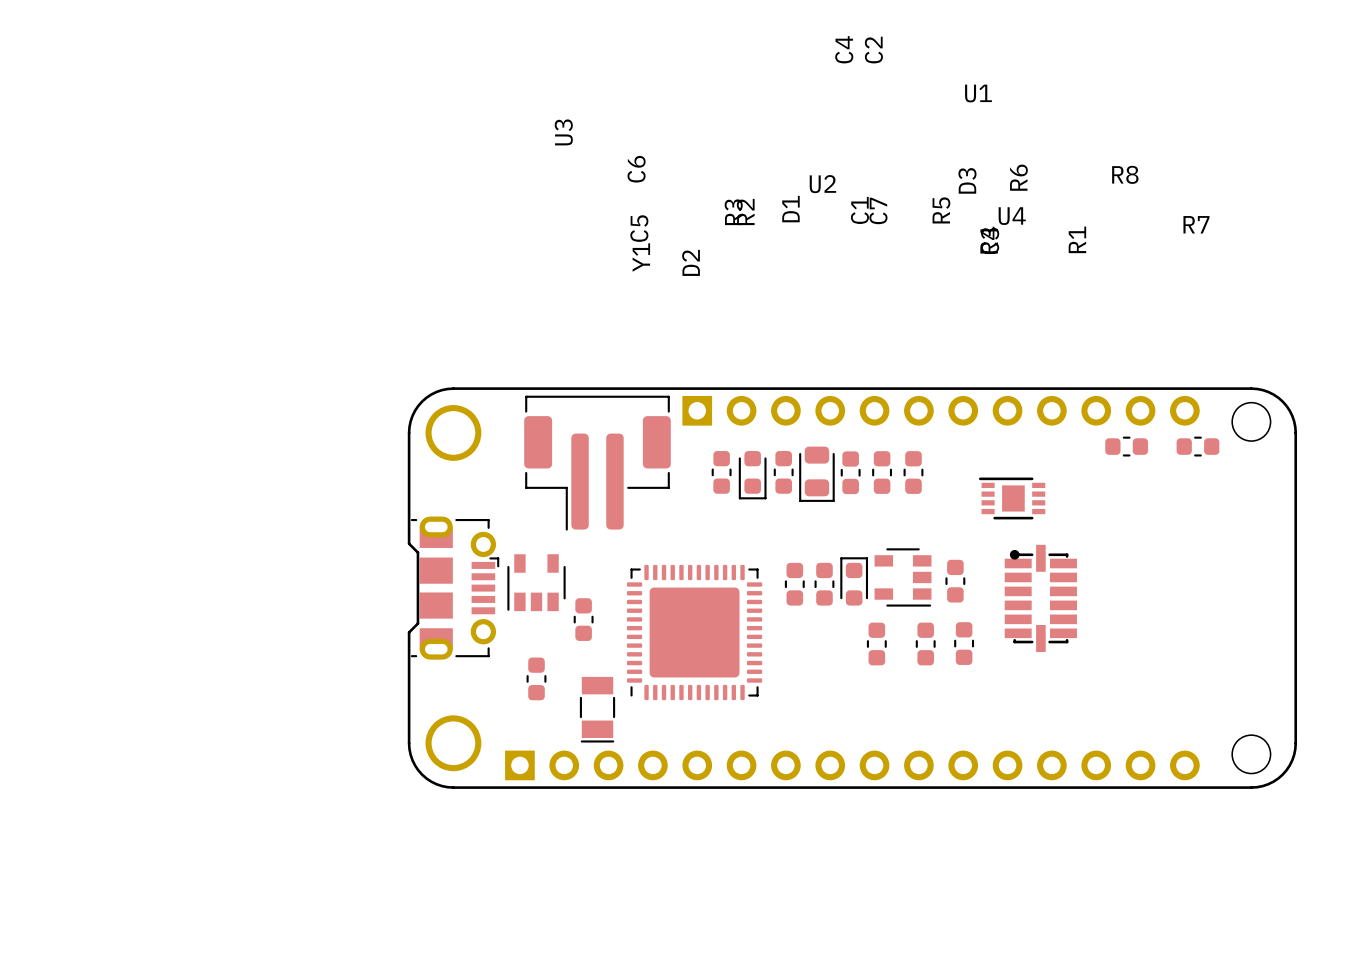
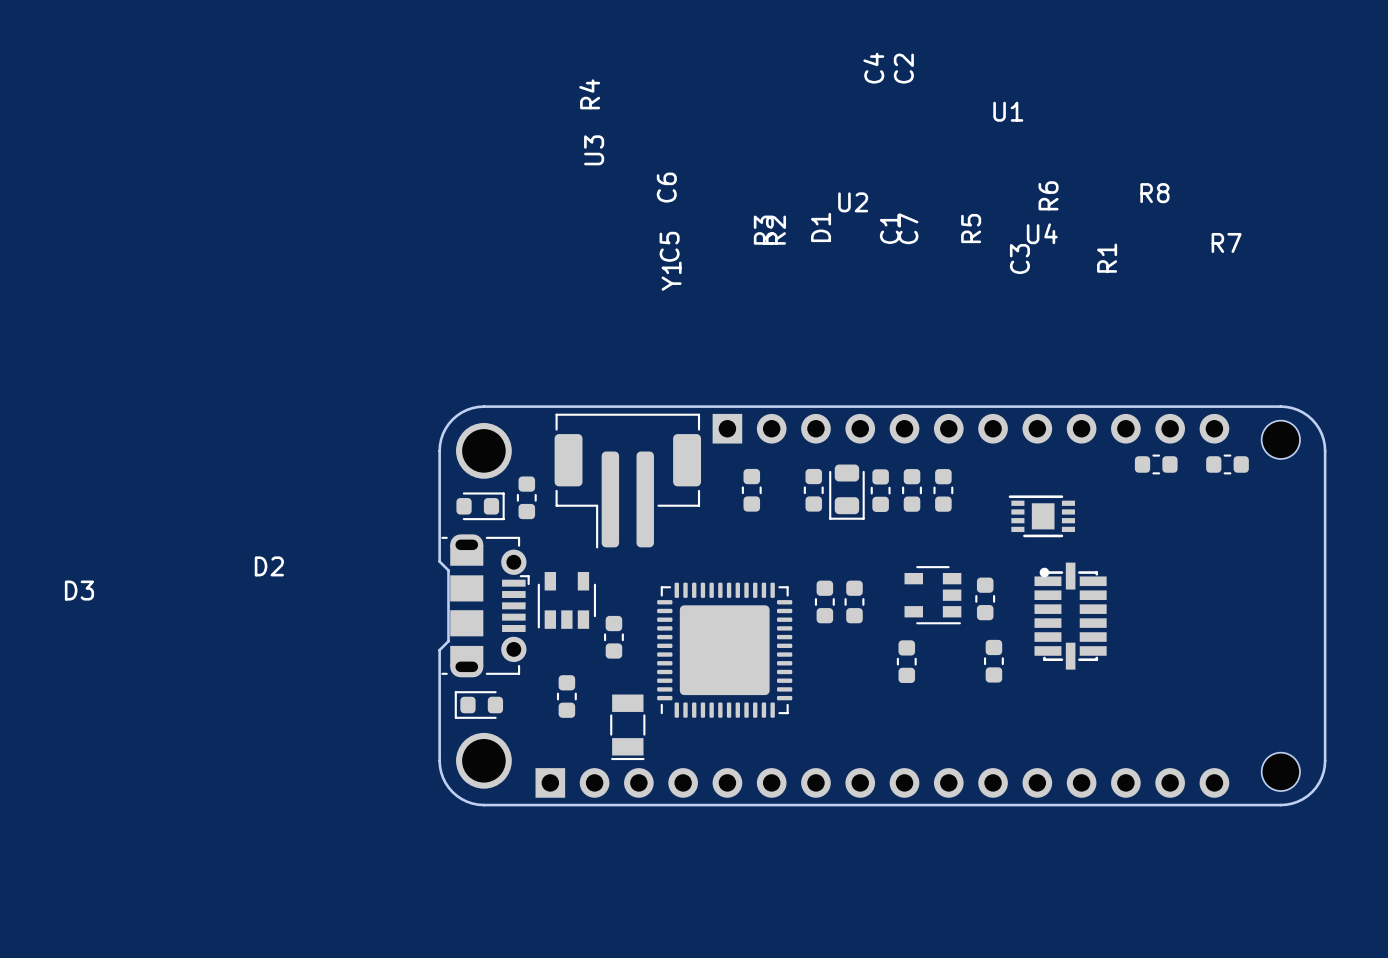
D2 rotation: 0° (752, 475) -> 90° counterclockwise (480, 506)
D2 position: (752, 475) -> (480, 506)
D3 rotation: 0° (854, 581) -> 90° counterclockwise (478, 705)
D3 position: (854, 581) -> (478, 705)
R4 position: (925, 643) -> (526, 497)

